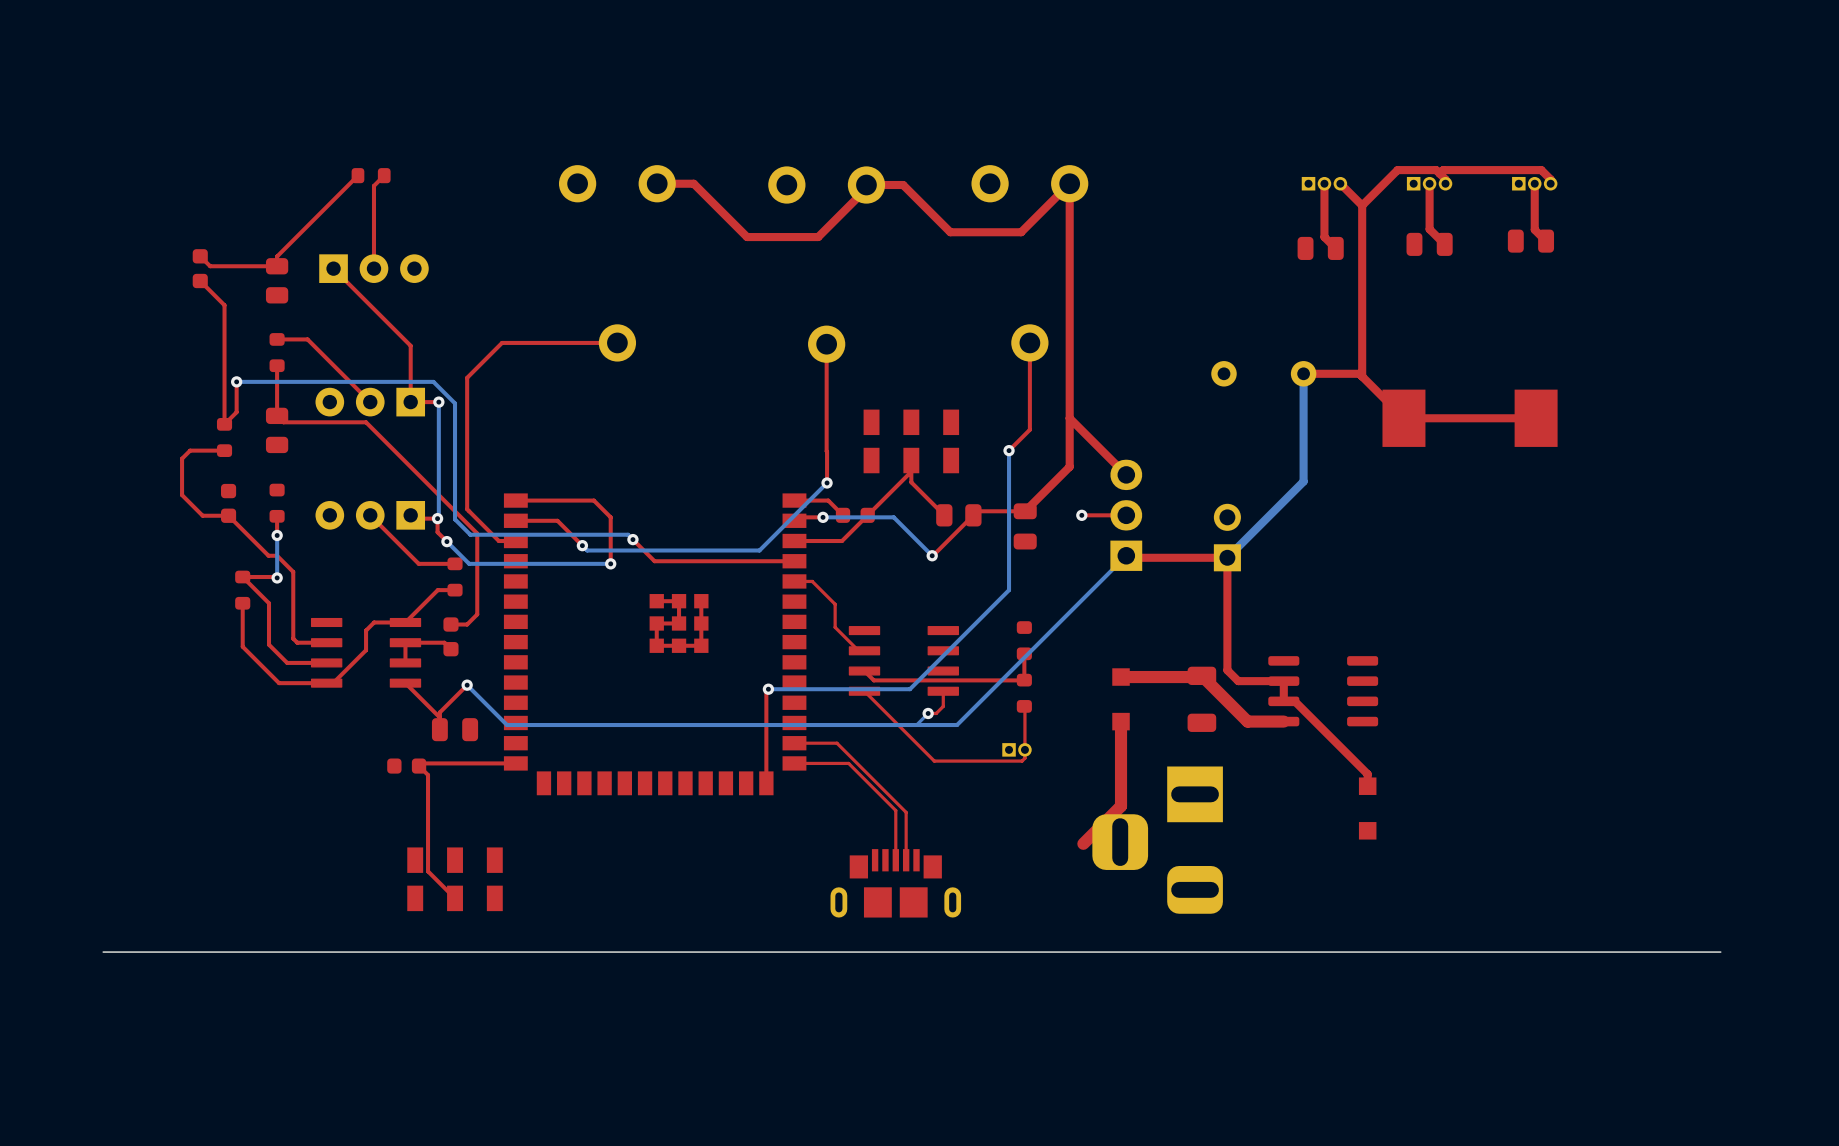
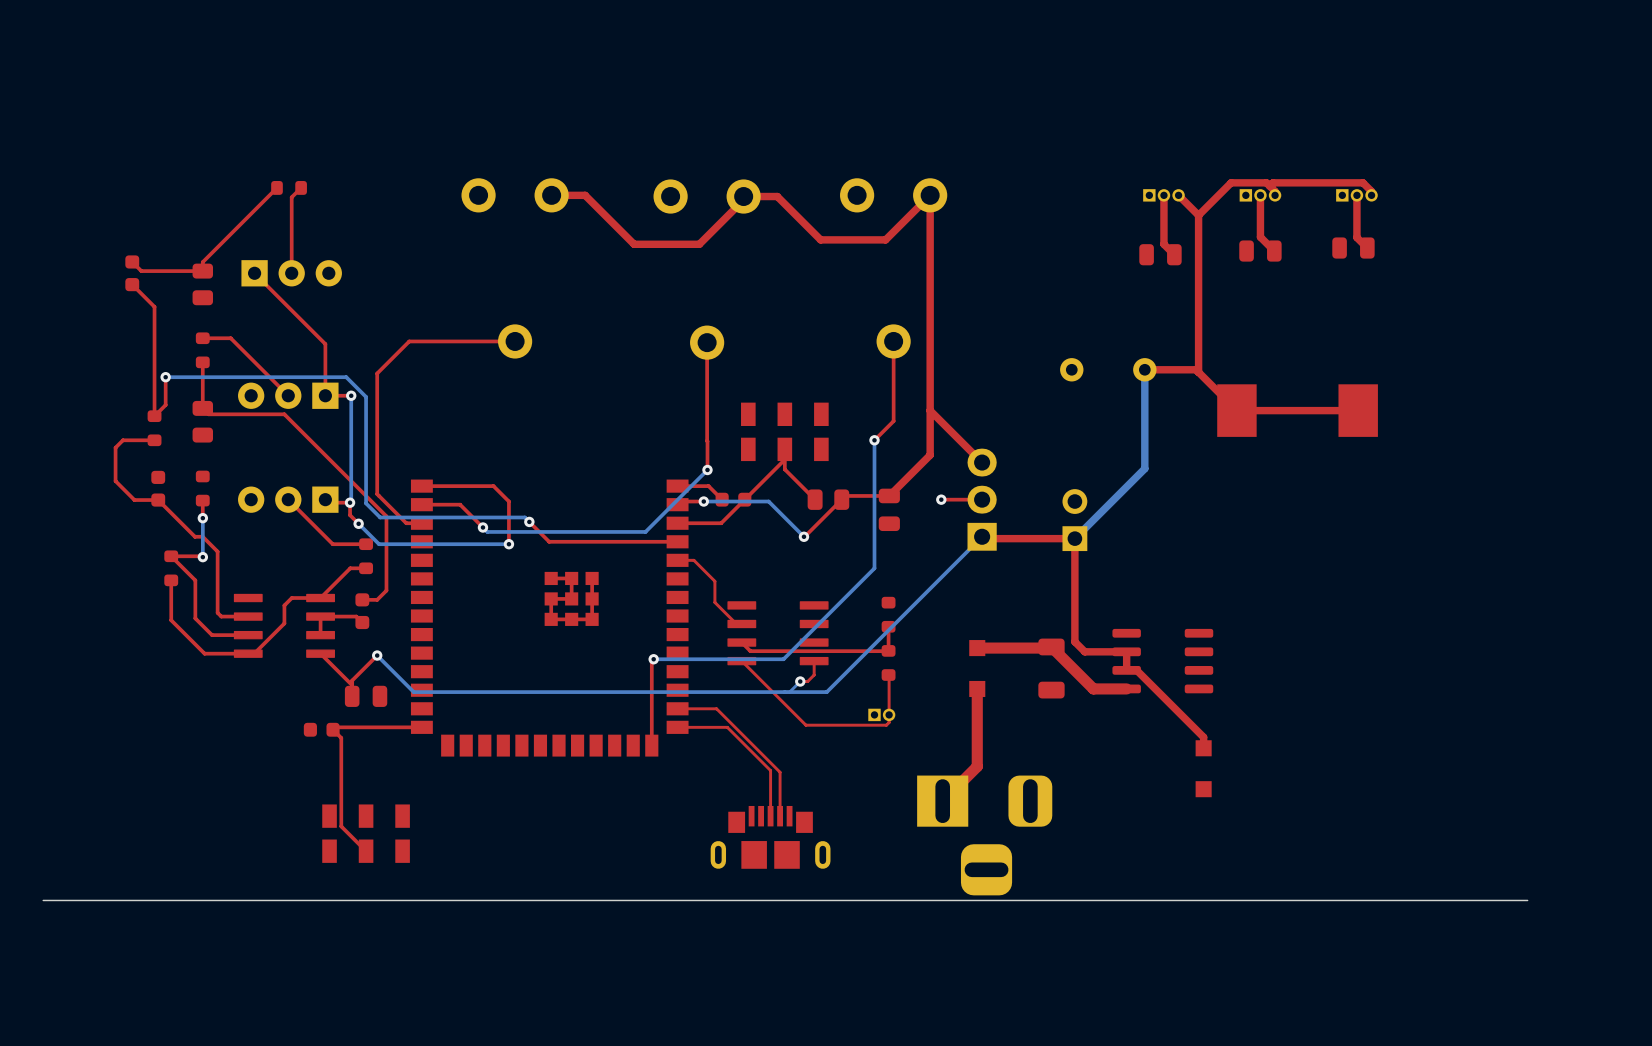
part rotation: 0° (1157, 840) -> 90° counterclockwise (984, 835)

